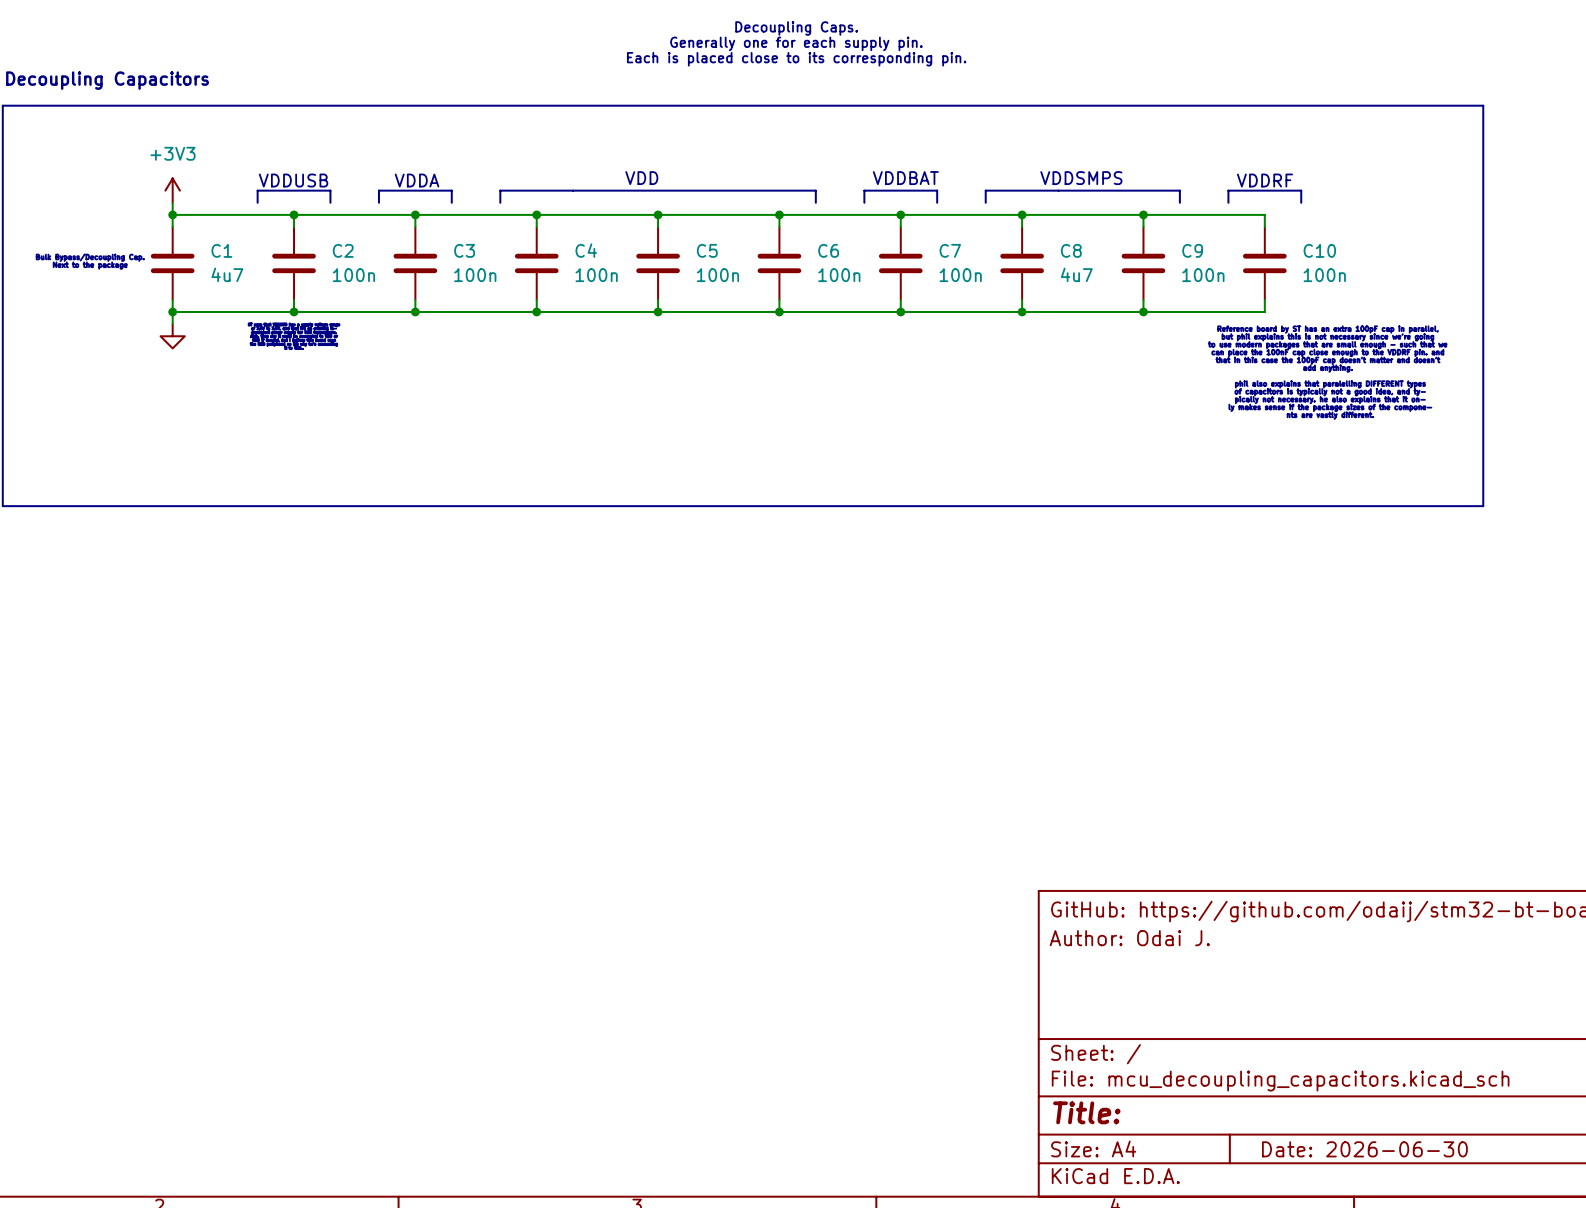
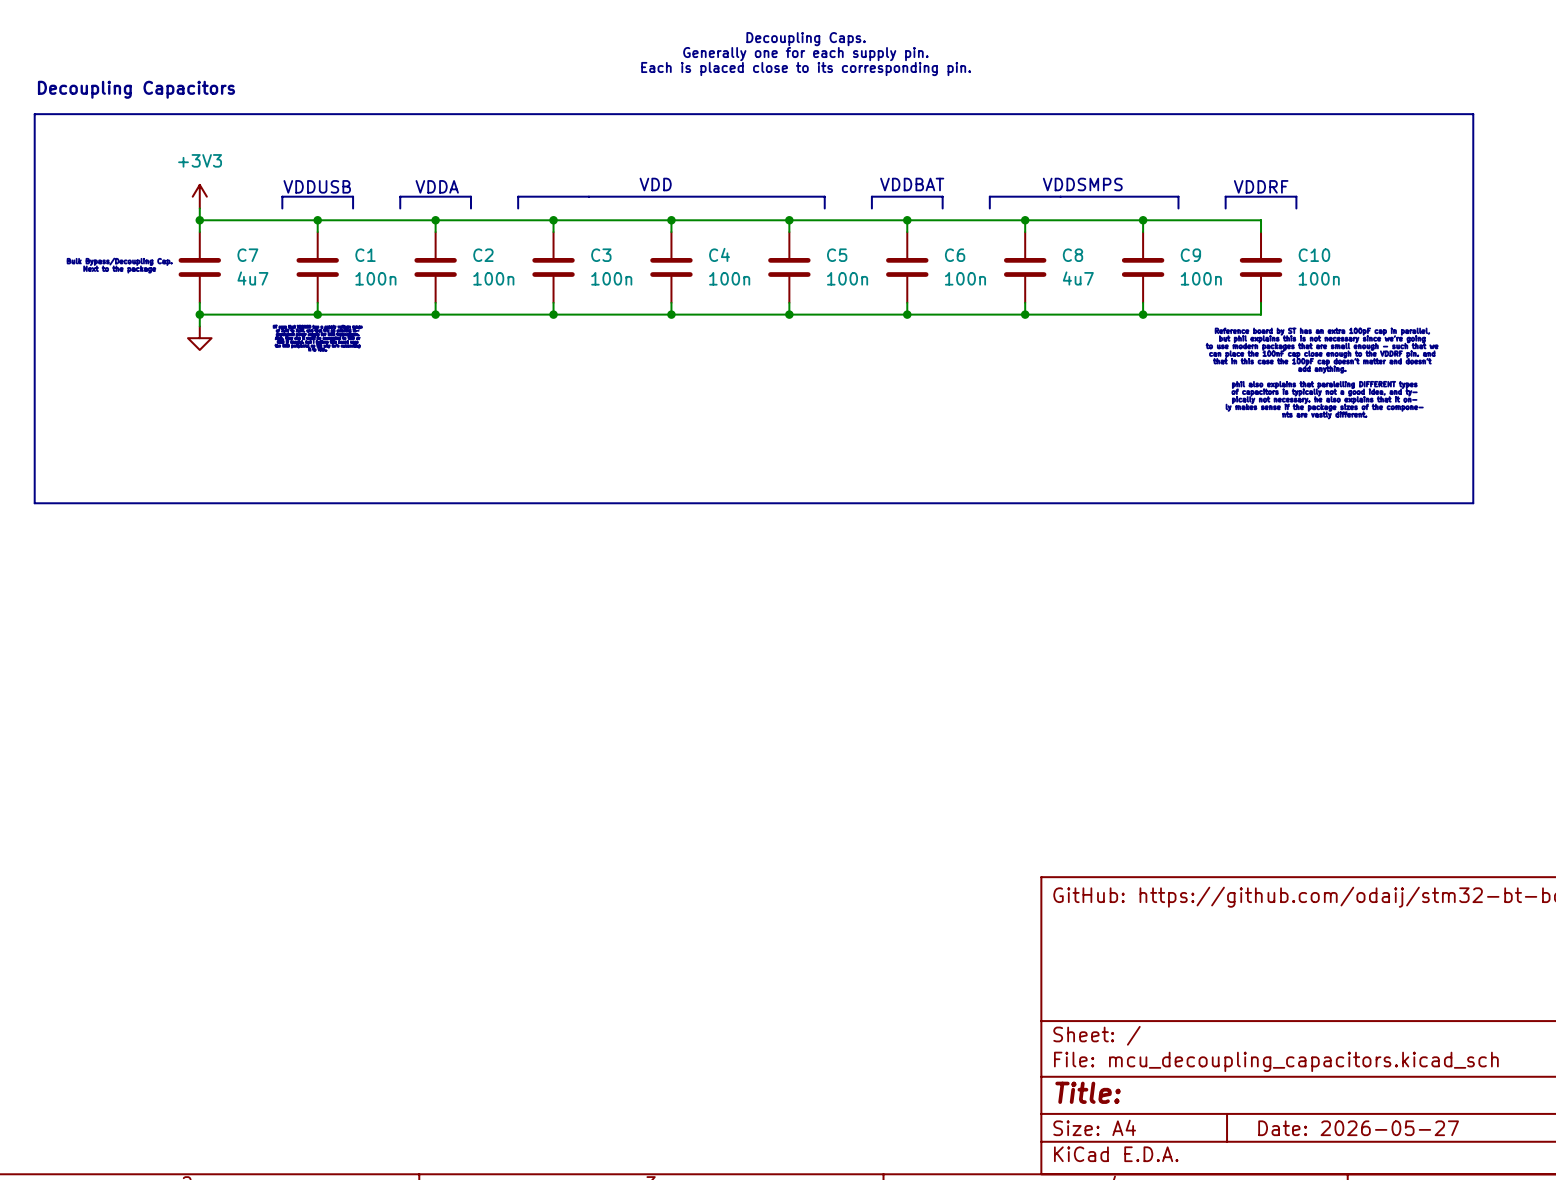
C1 name: C1 (221, 250) -> C7 (247, 255)
C2 name: C2 (343, 250) -> C1 (365, 255)
C3 name: C3 (464, 250) -> C2 (483, 255)
C4 name: C4 (586, 250) -> C3 (601, 255)
C5 name: C5 (707, 250) -> C4 (719, 254)
C6 name: C6 (828, 250) -> C5 (837, 255)
C7 name: C7 (950, 250) -> C6 (955, 255)
title block: Author: Odai J. (1129, 938) -> none
title block: Date: 2026-06-30 (1364, 1149) -> Date: 2026-05-27 (1358, 1128)

